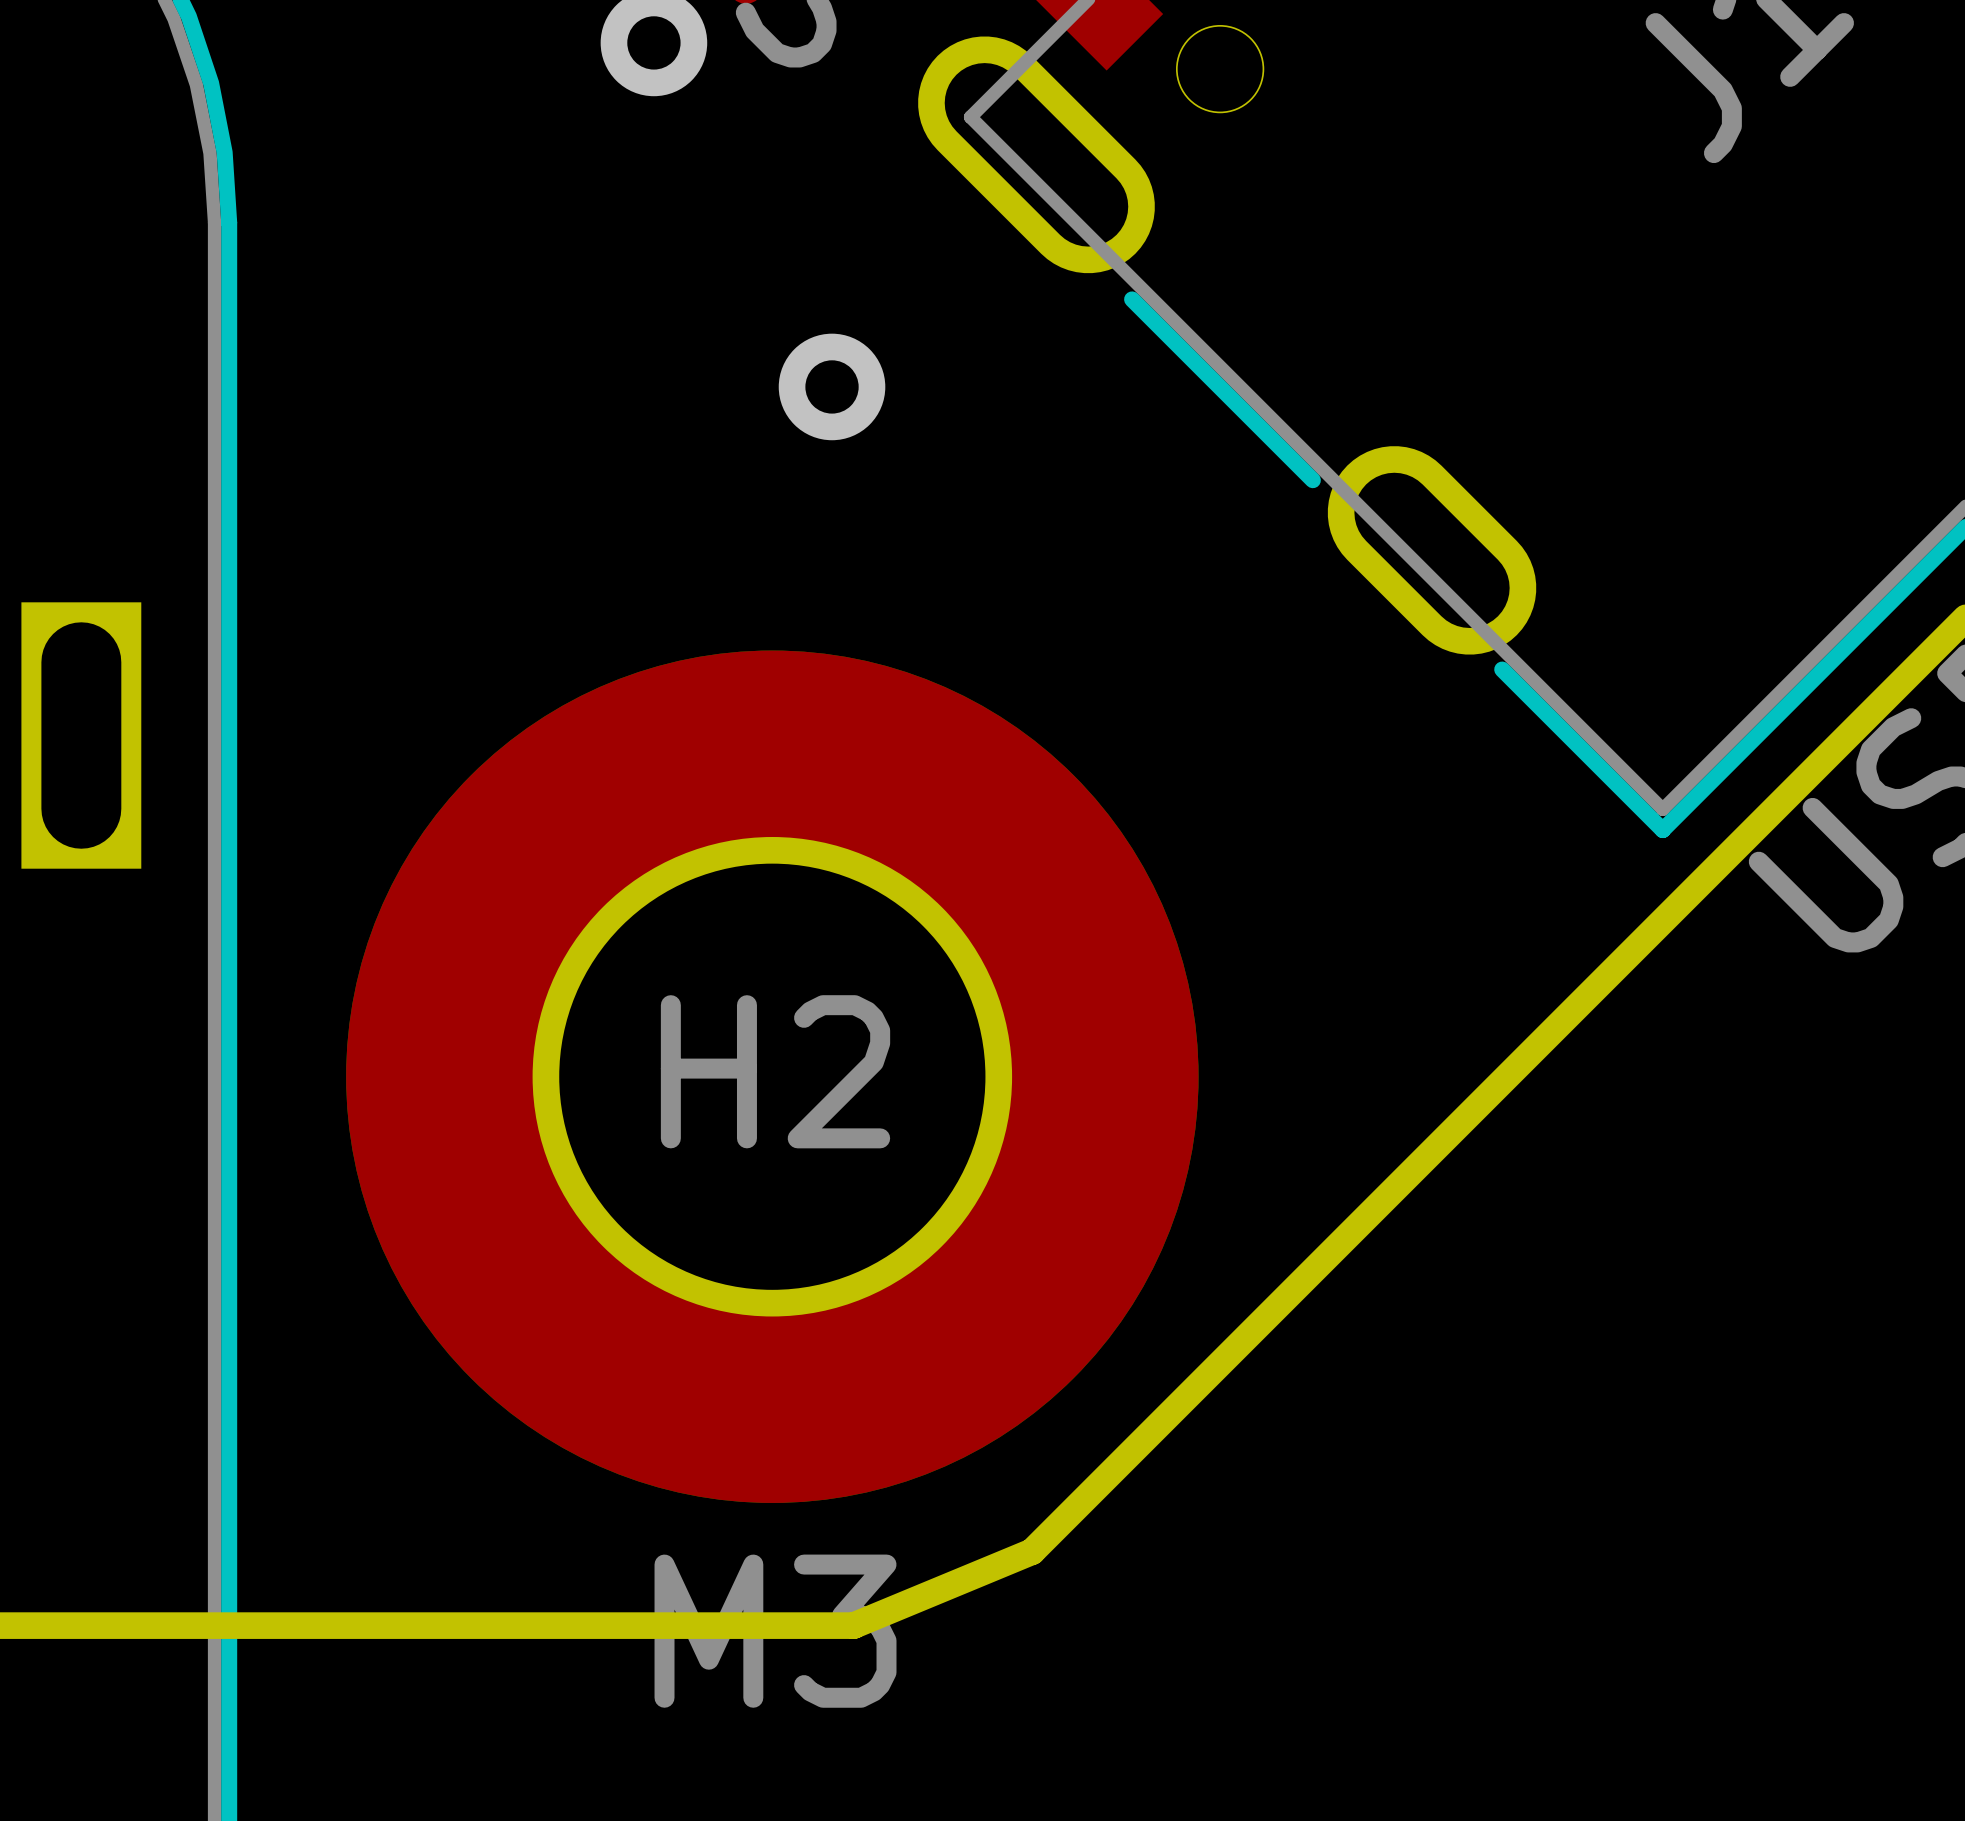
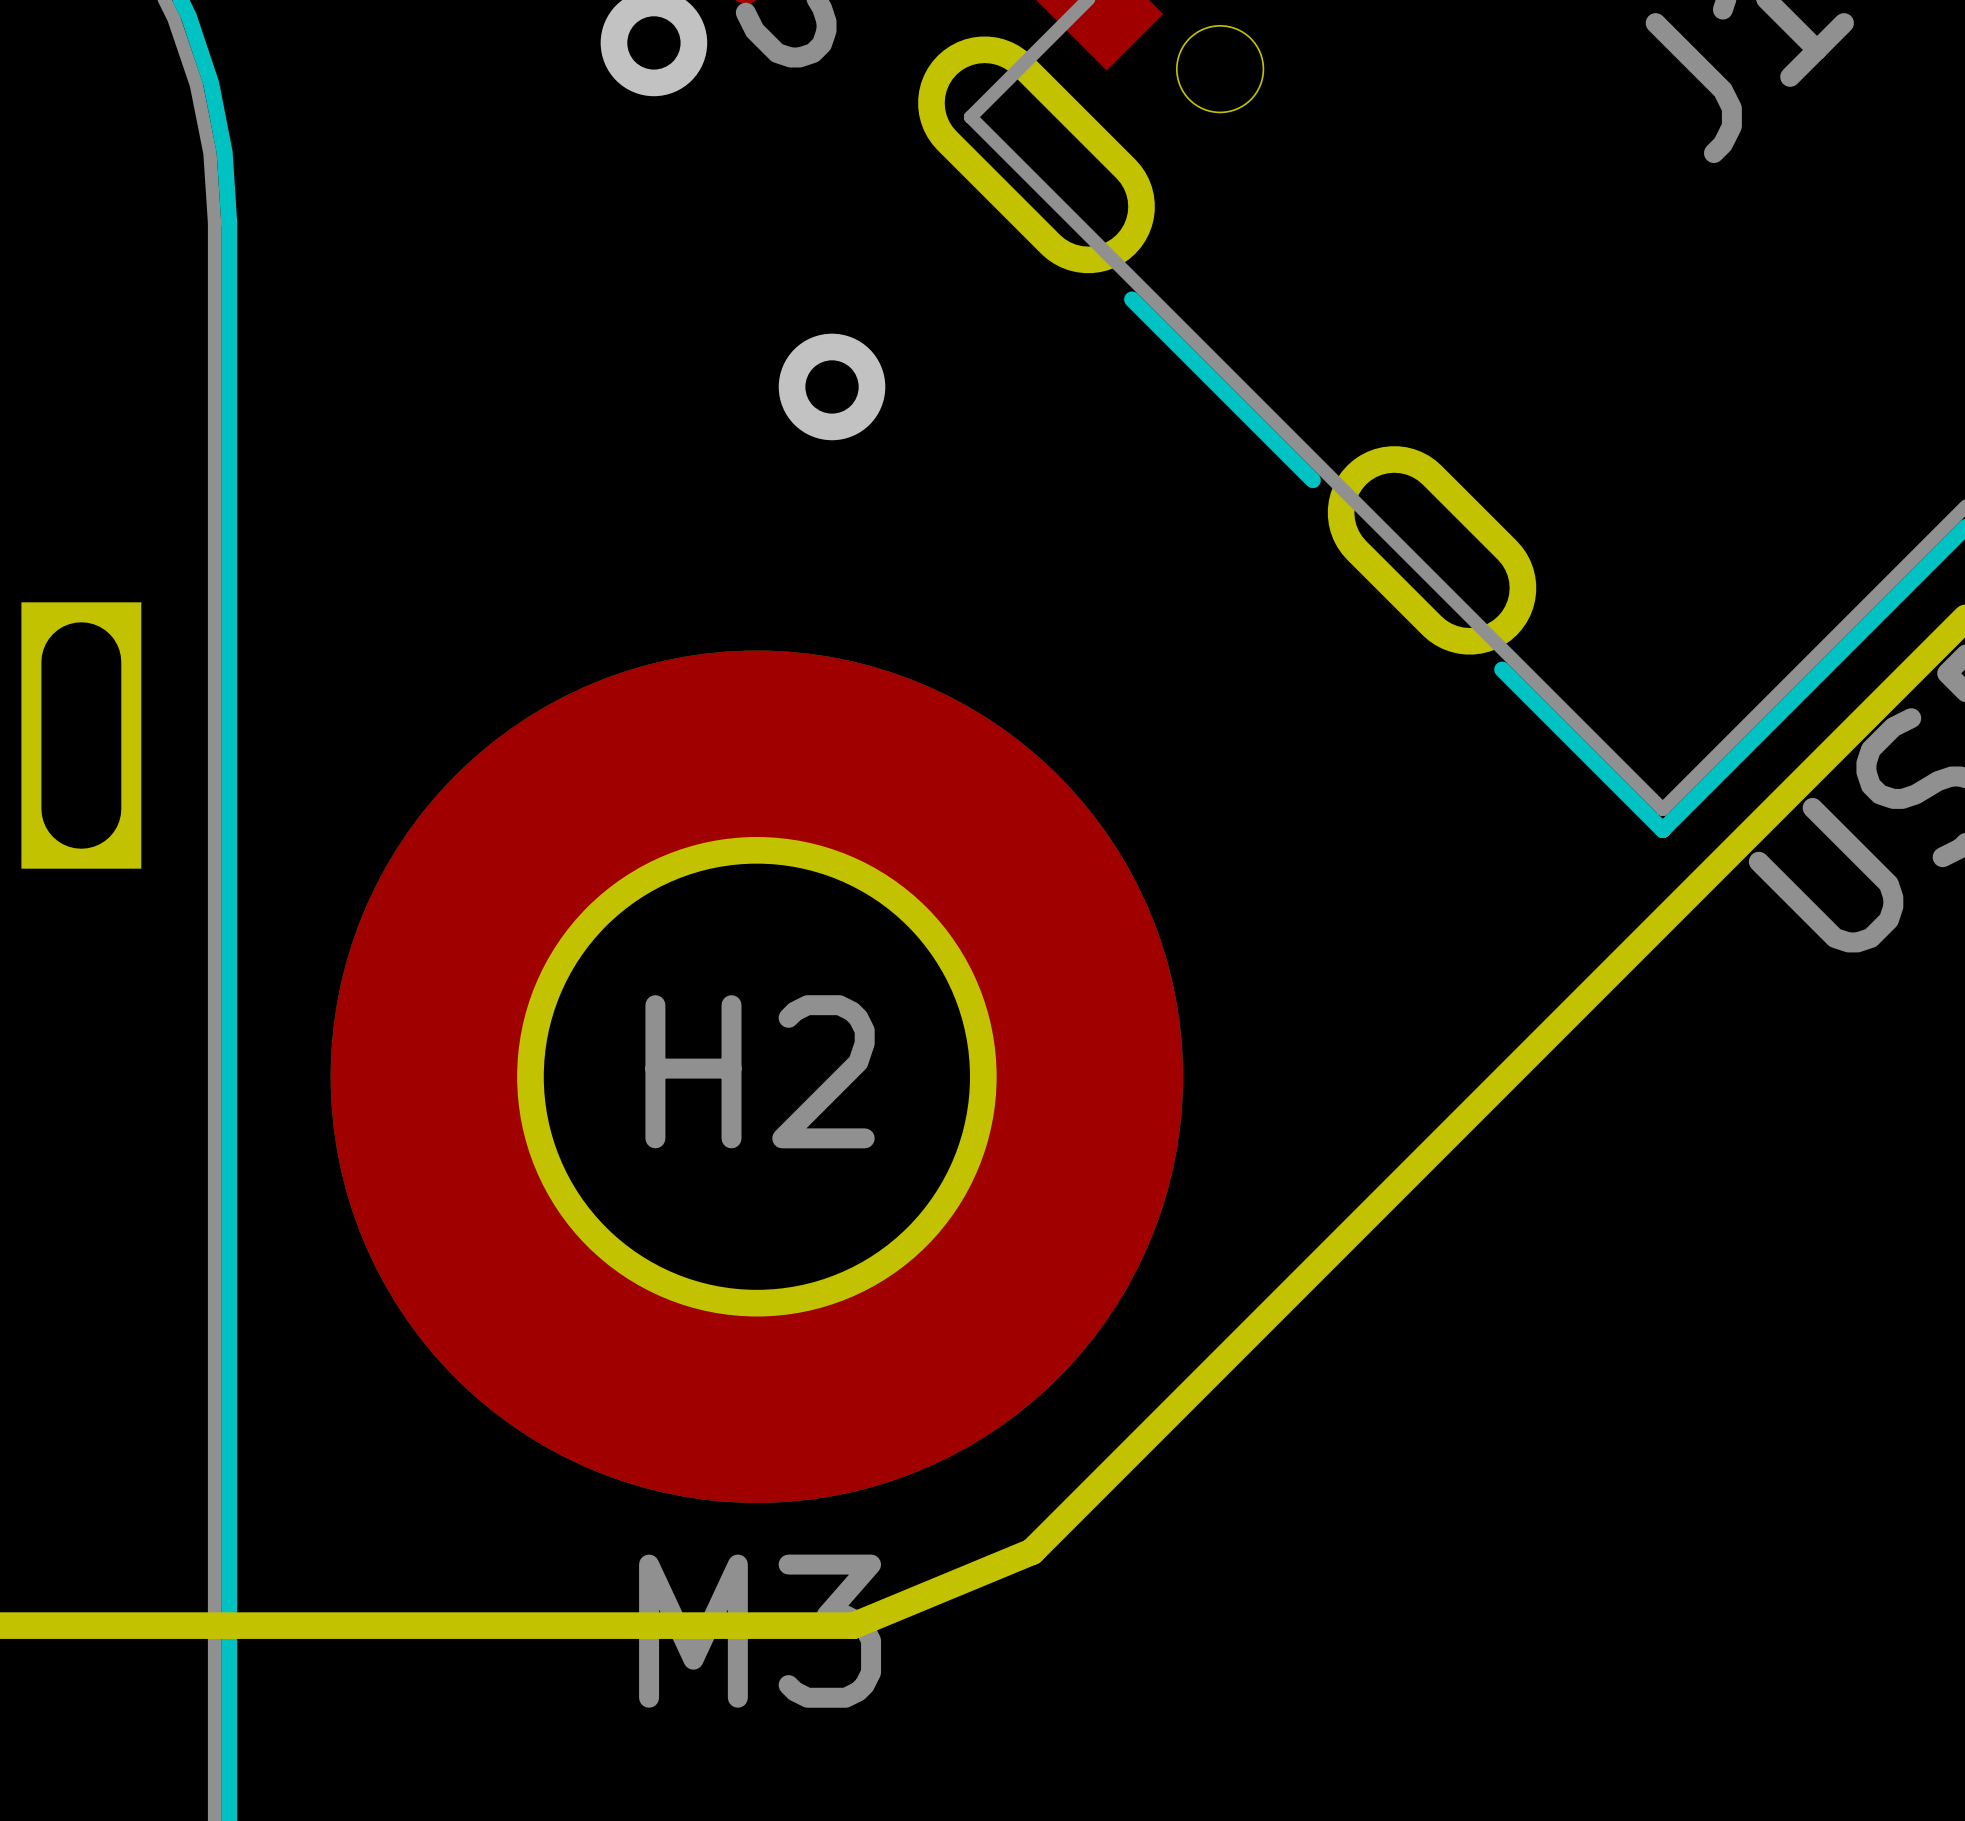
H2 position: (772, 1076) -> (756, 1076)

